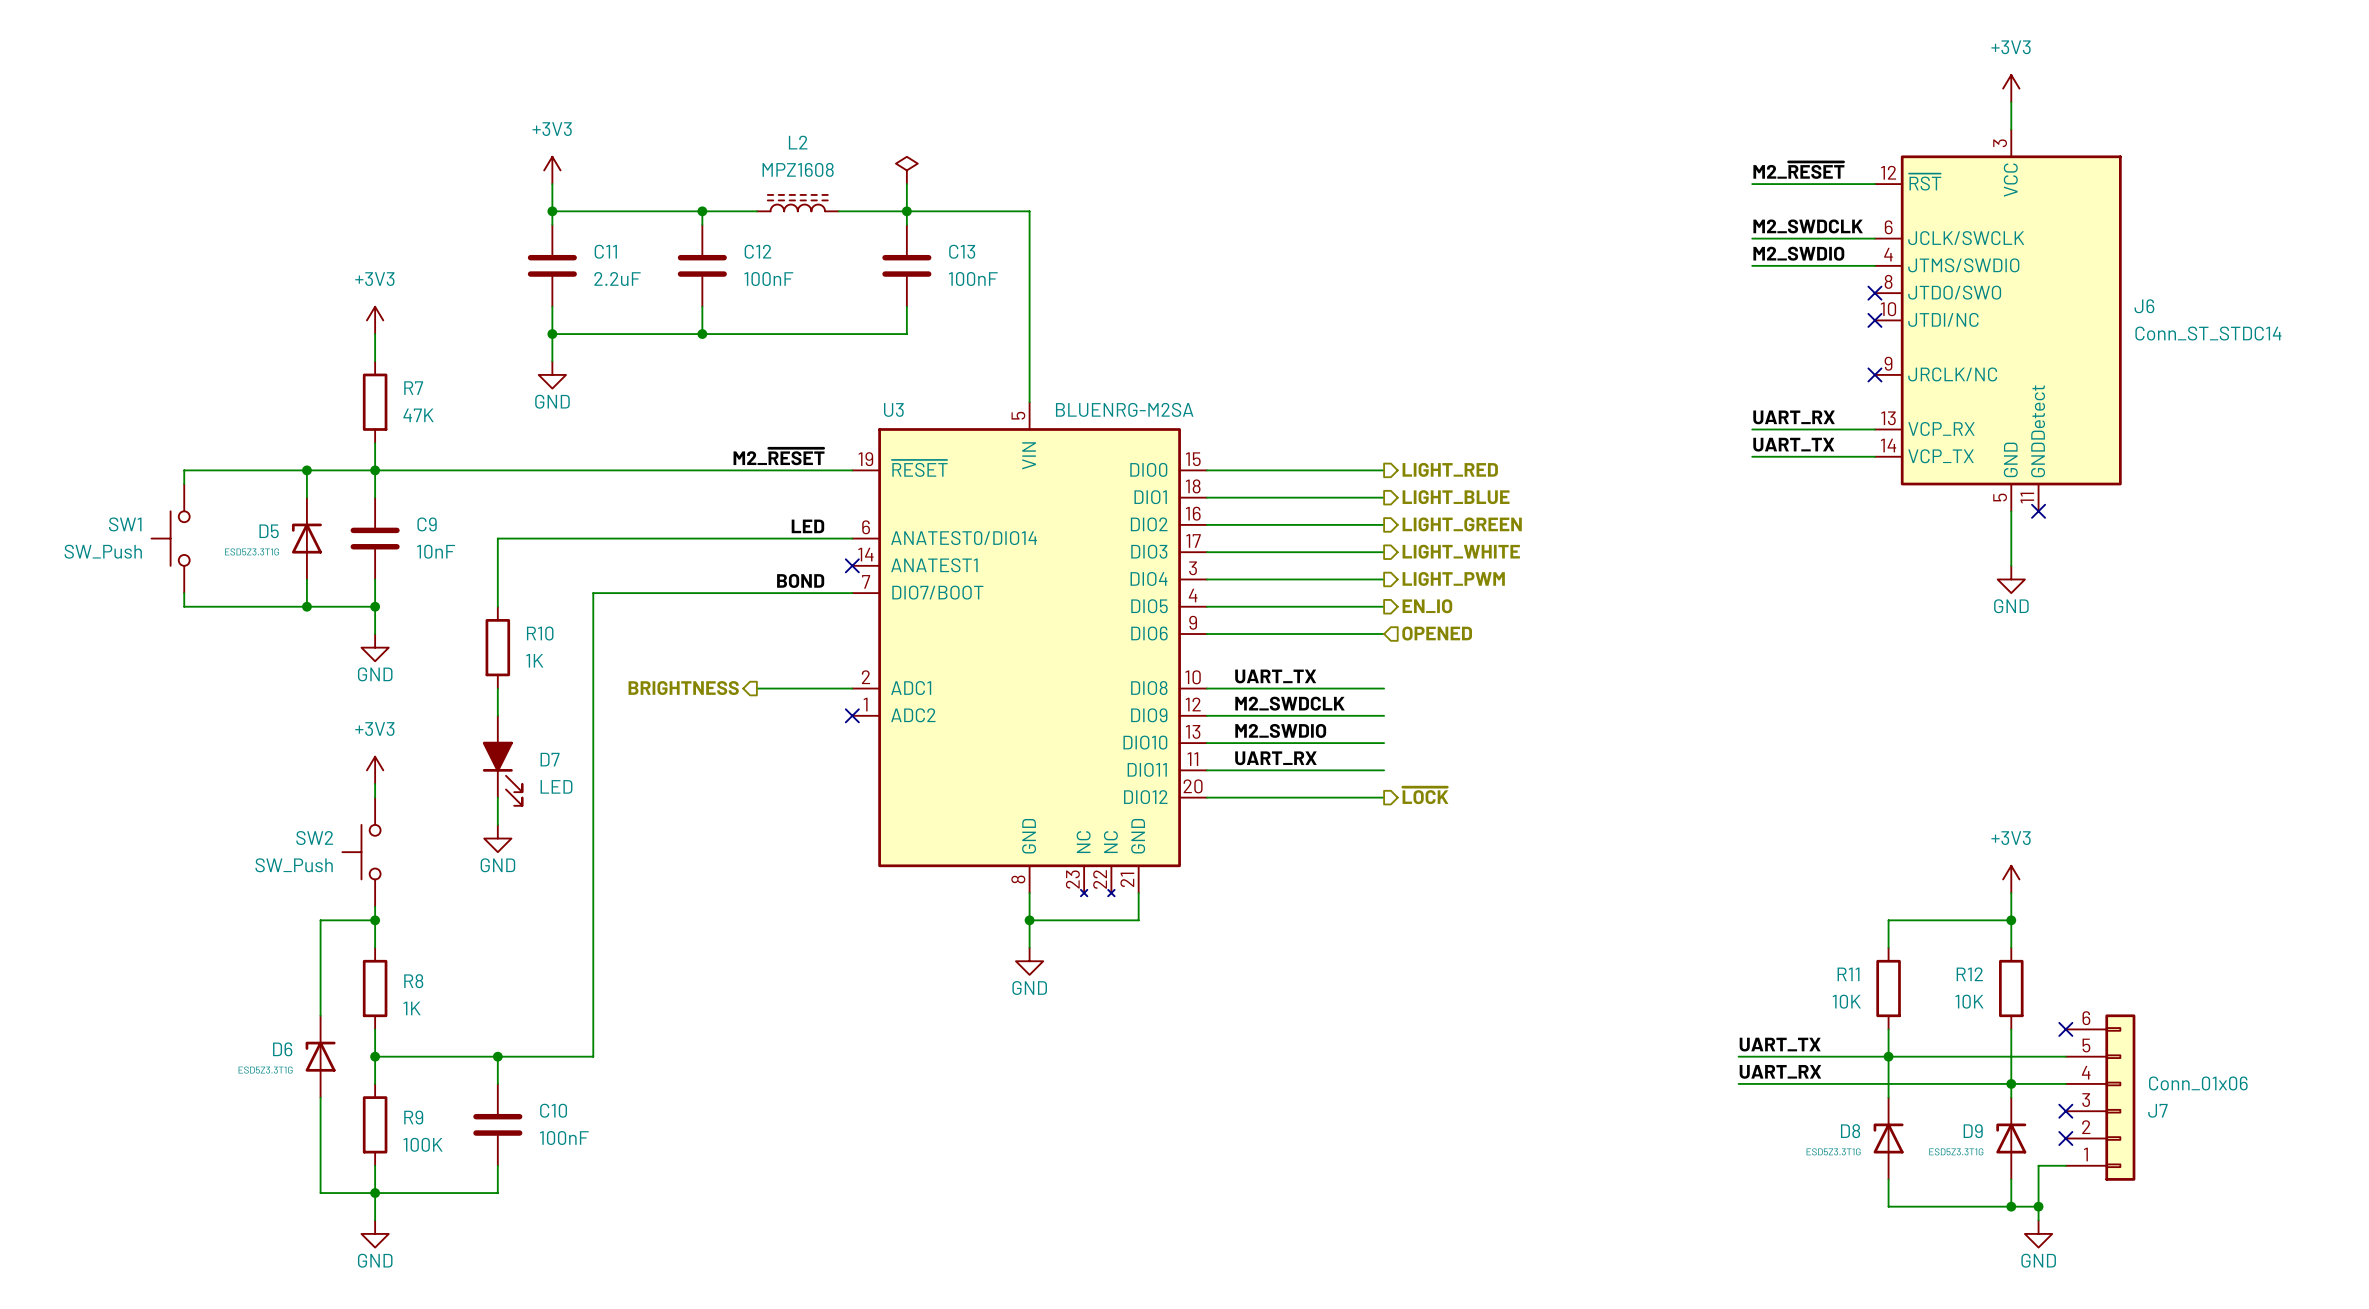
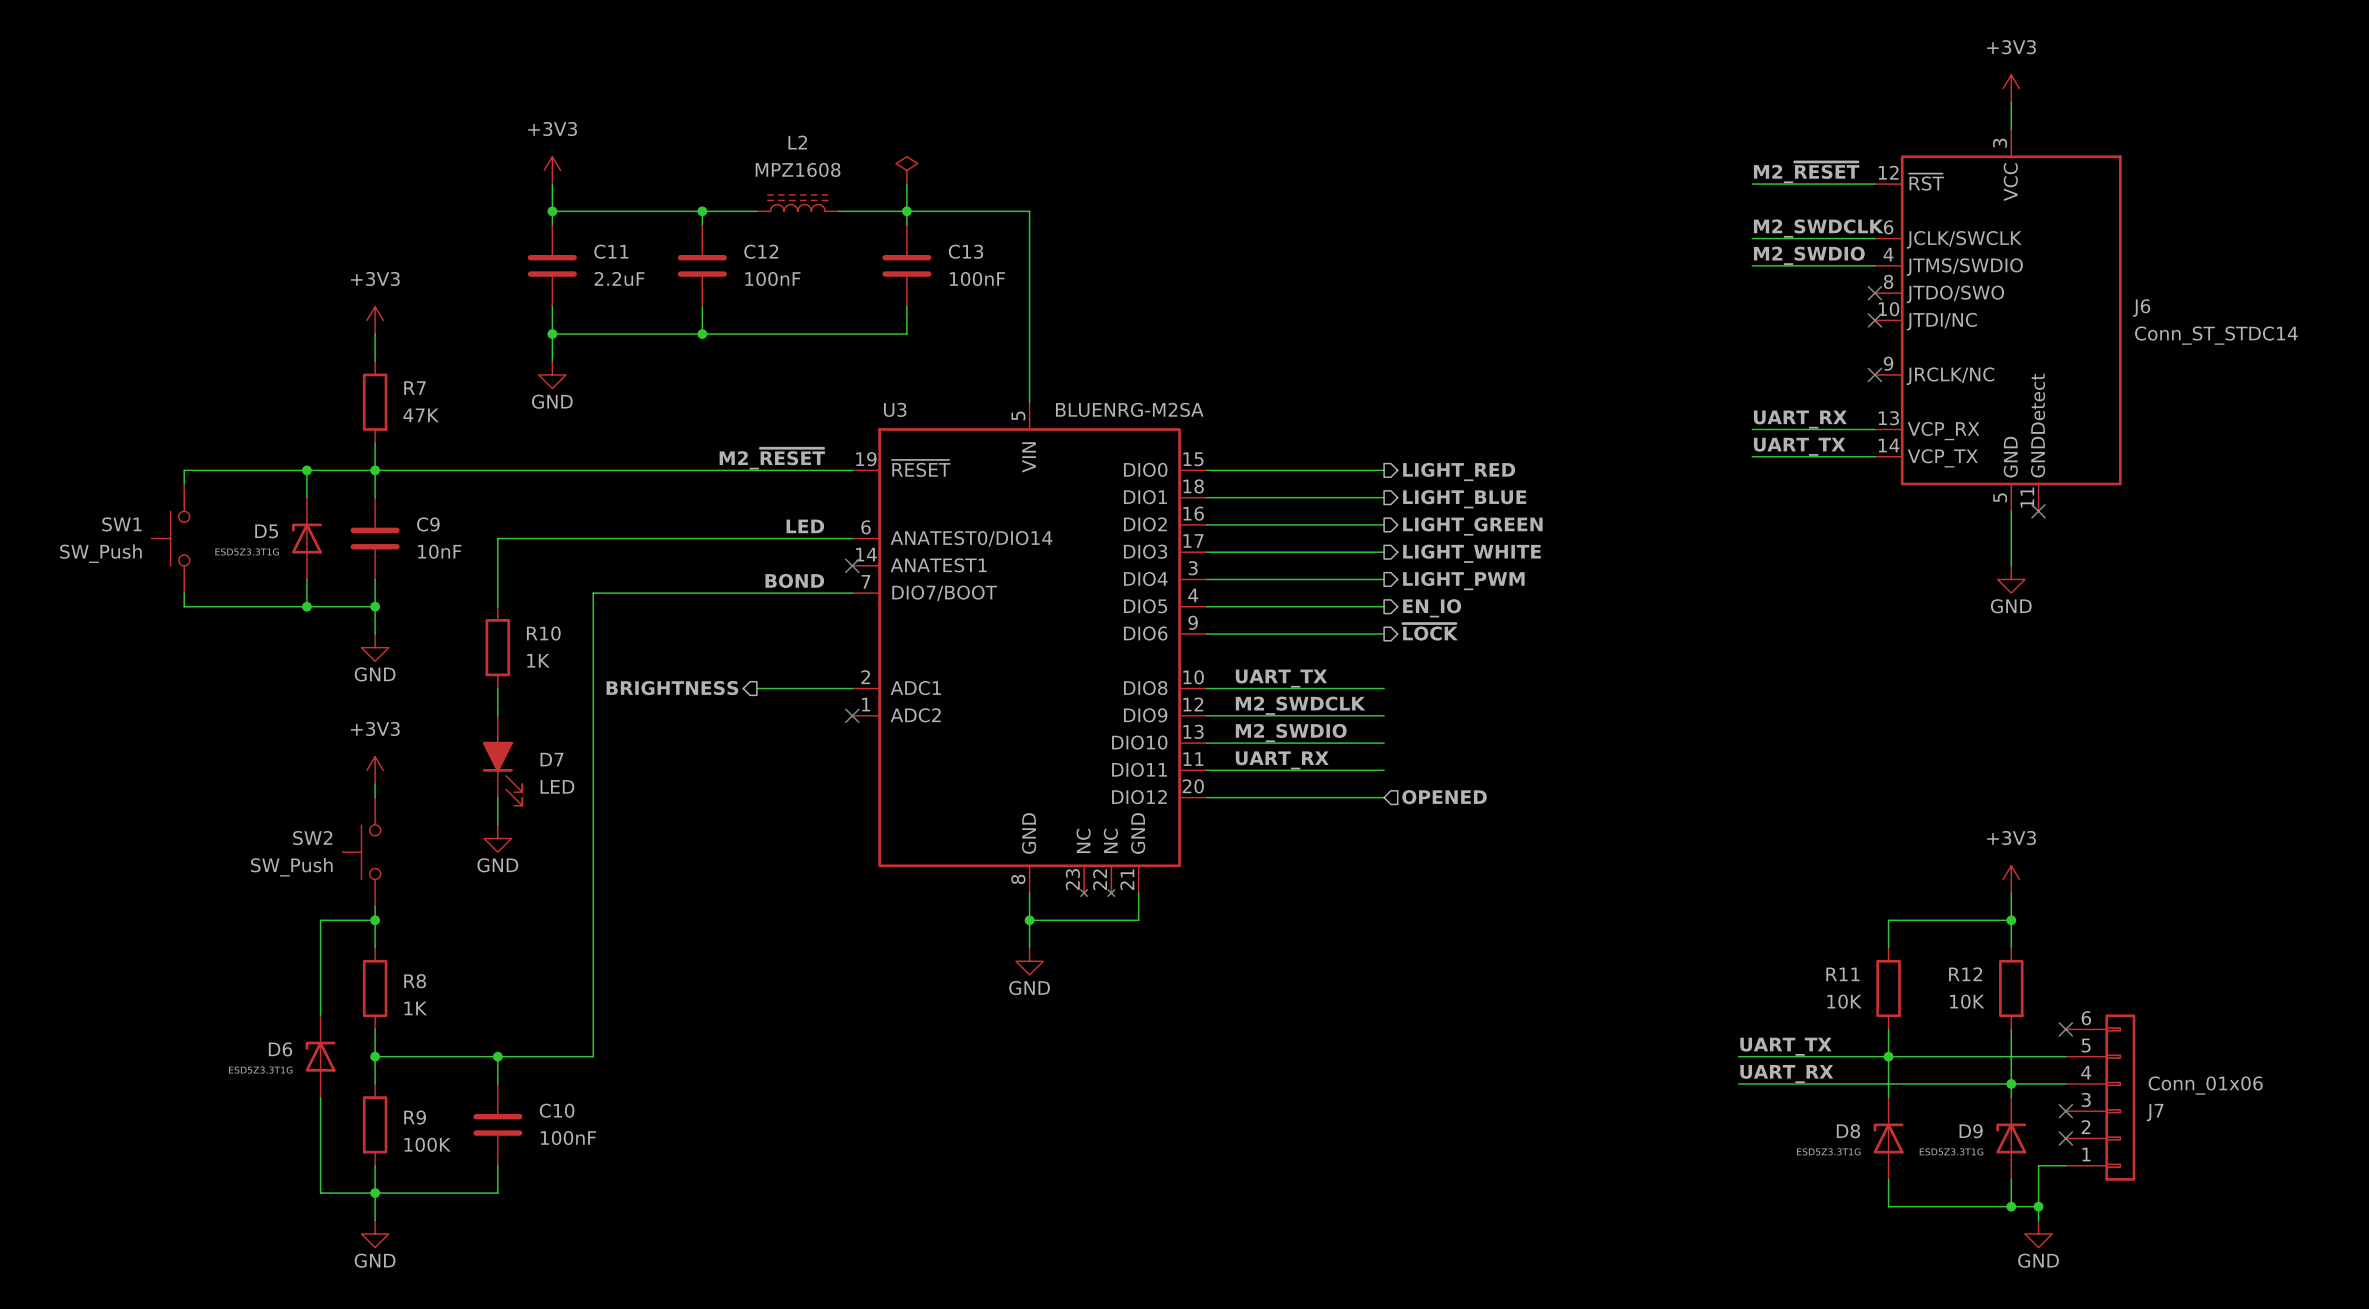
hierarchical label shape: input (1437, 633) -> output (1430, 632)
hierarchical label: OPENED (1437, 633) -> ~{LOCK} (1430, 632)
hierarchical label shape: output (1425, 795) -> input (1444, 797)
hierarchical label: ~{LOCK} (1425, 795) -> OPENED (1444, 797)

